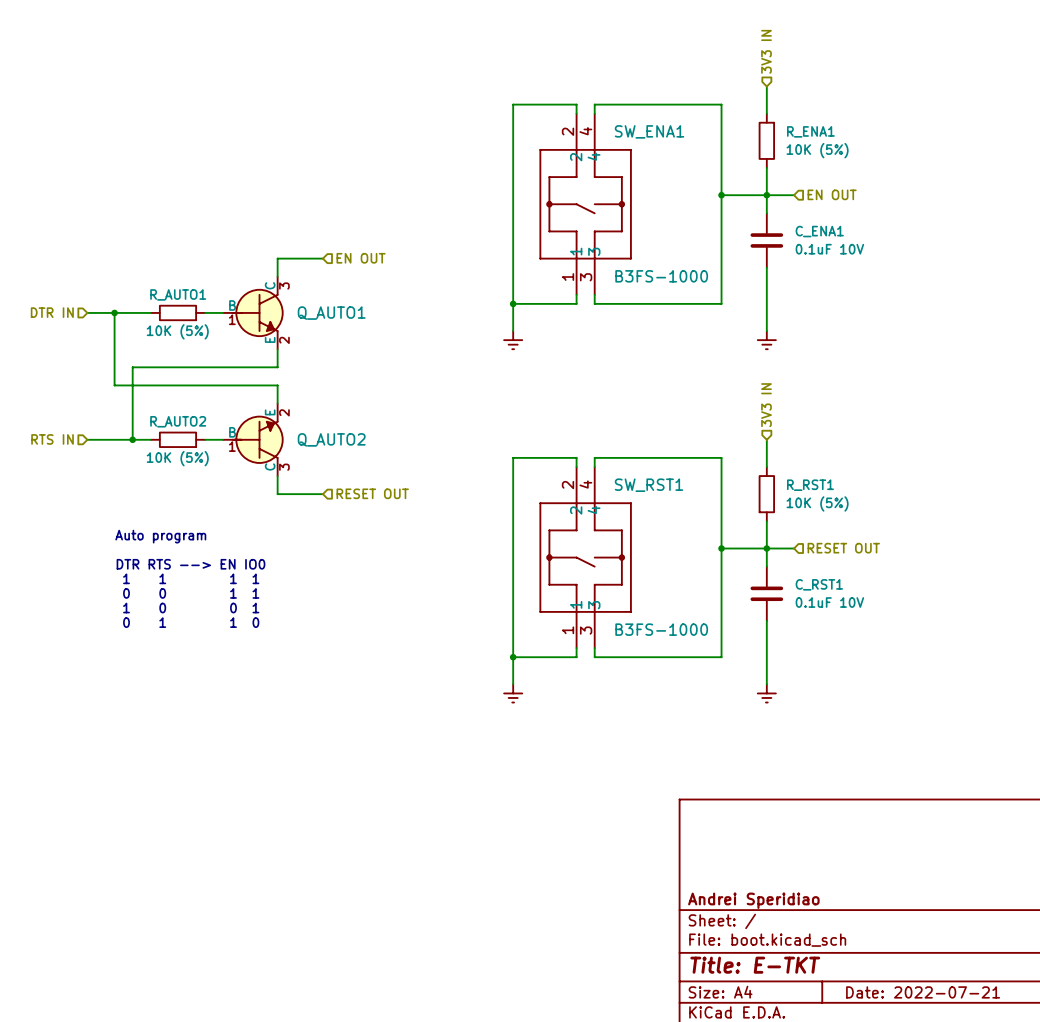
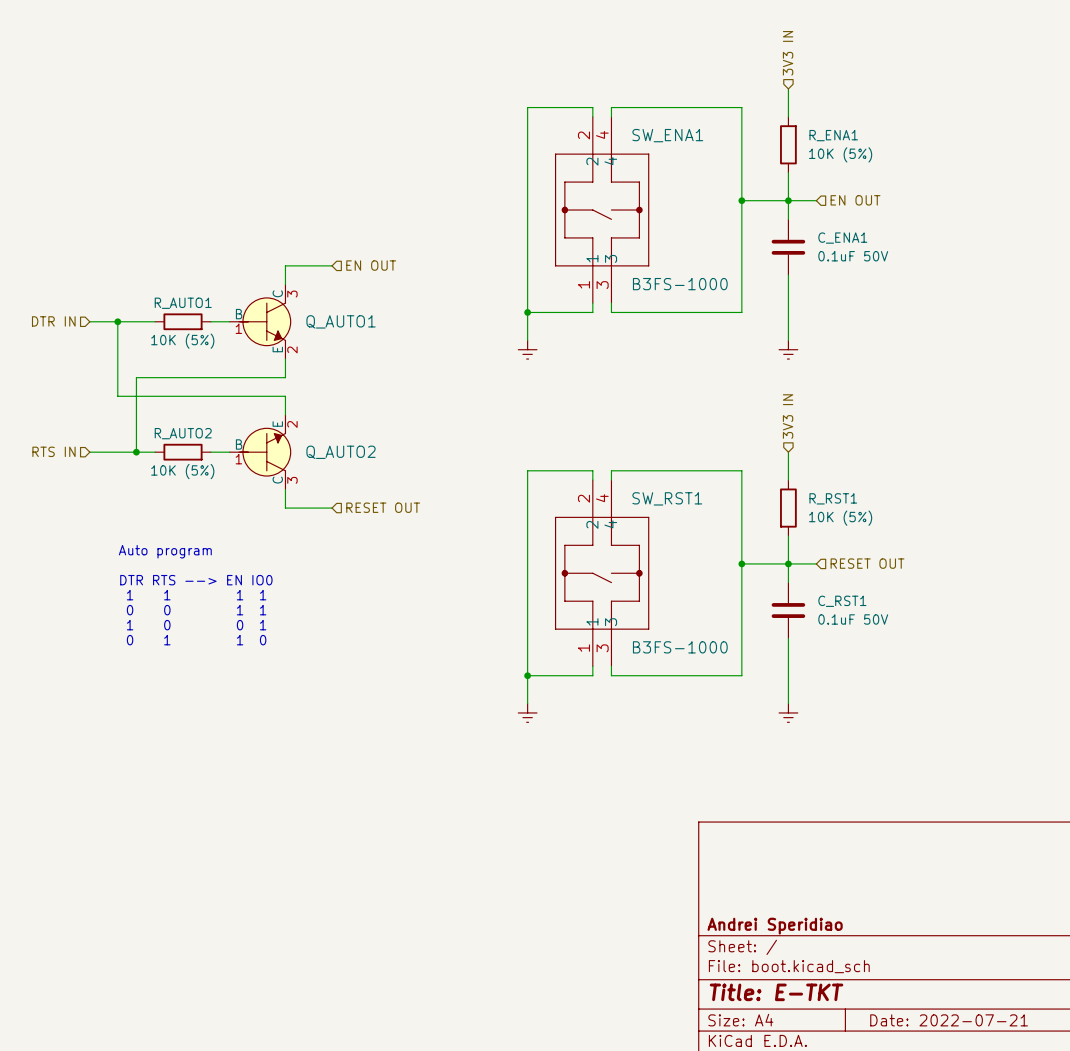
C_ENA1 value: 0.1uF 10V (829, 249) -> 0.1uF 50V (853, 256)
C_RST1 value: 0.1uF 10V (829, 602) -> 0.1uF 50V (853, 619)

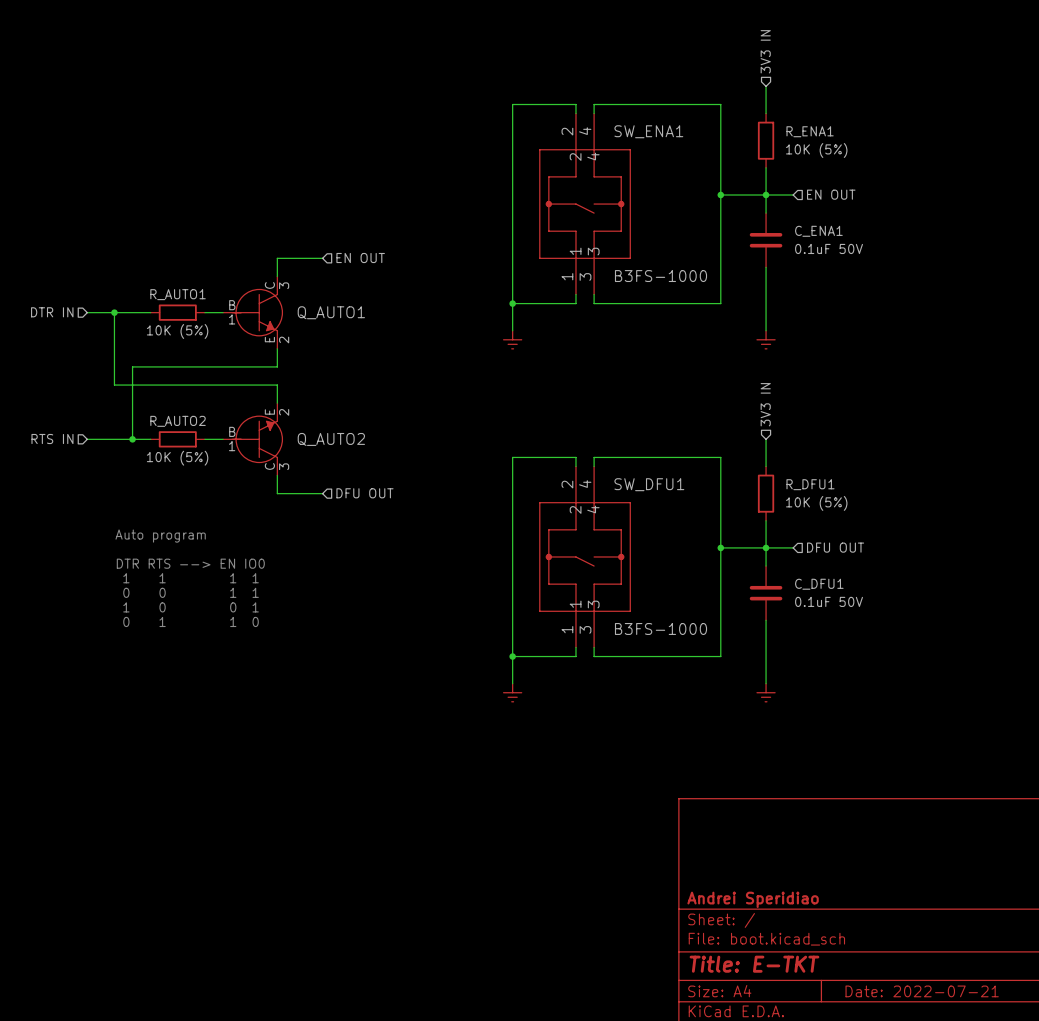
SW_RST1 name: SW_RST1 (667, 498) -> SW_DFU1 (649, 484)
R_RST1 name: R_RST1 (833, 498) -> R_DFU1 (810, 484)
hierarchical label: RESET OUT (383, 507) -> DFU OUT (364, 493)
hierarchical label: RESET OUT (867, 563) -> DFU OUT (835, 547)
C_RST1 name: C_RST1 (842, 601) -> C_DFU1 (819, 584)

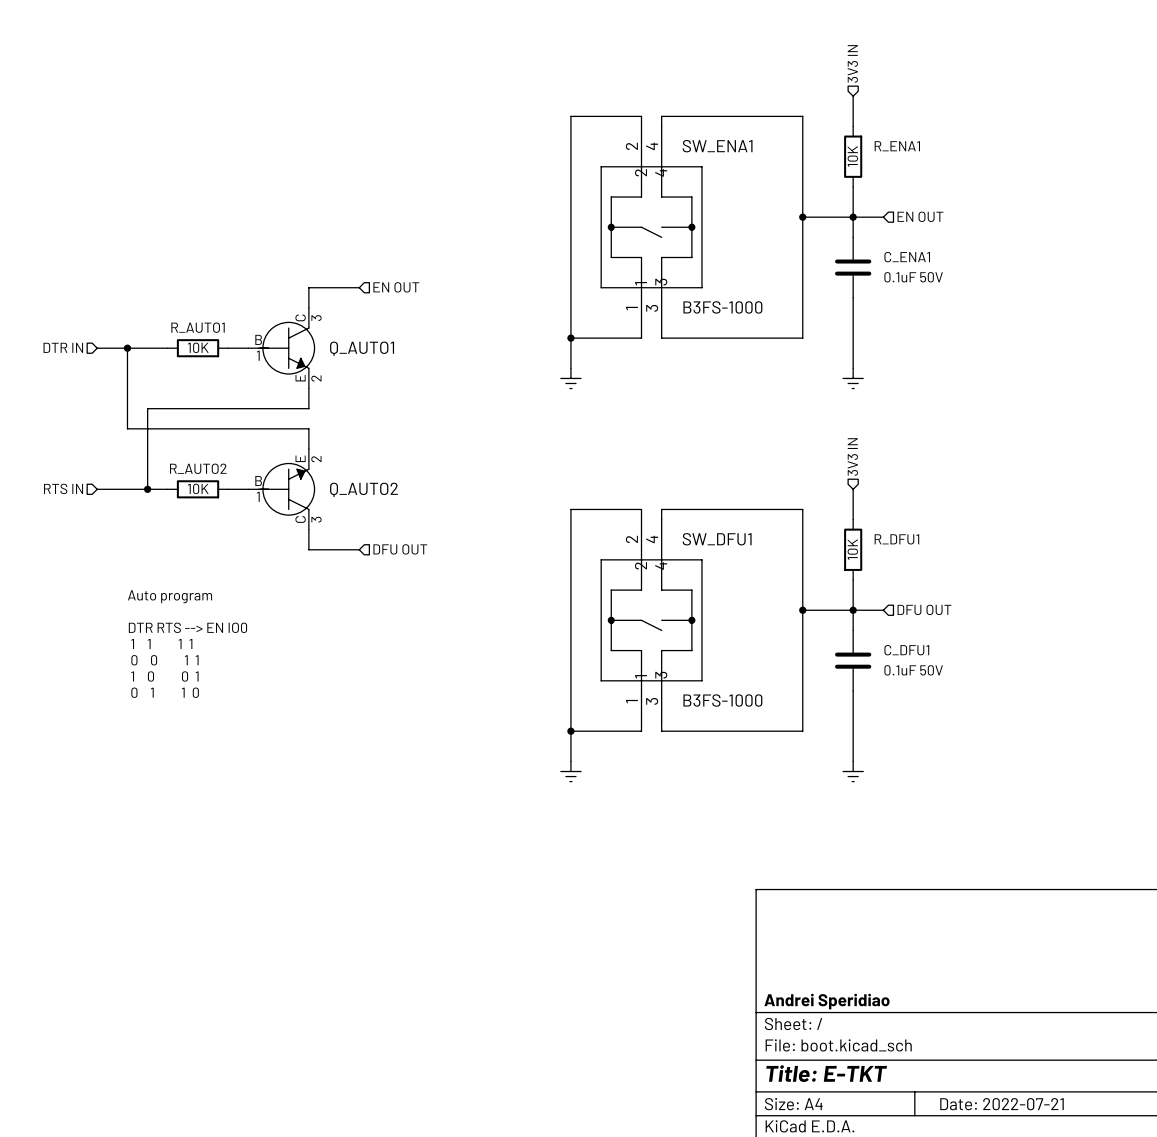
R_ENA1 value: 10K (5%) (816, 150) -> 10K (852, 156)
R_AUTO1 value: 10K (5%) (177, 331) -> 10K (198, 347)
R_AUTO2 value: 10K (5%) (177, 458) -> 10K (198, 488)
R_DFU1 value: 10K (5%) (816, 503) -> 10K (852, 549)

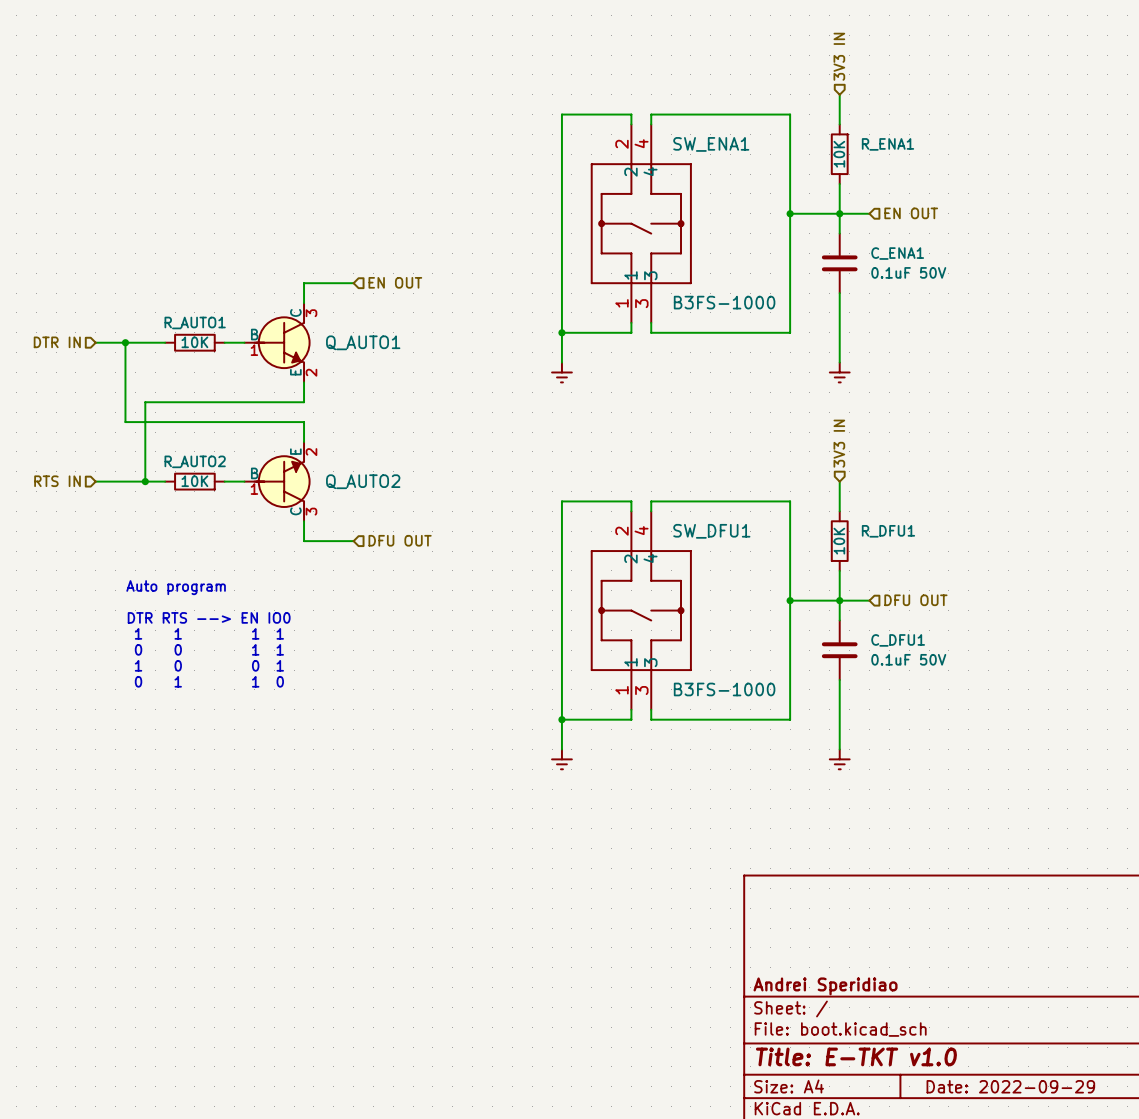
title block: Title: E-TKT (826, 1073) -> Title: E-TKT v1.0 (856, 1056)
title block: Date: 2022-07-21 (1001, 1104) -> Date: 2022-09-29 (1010, 1086)

